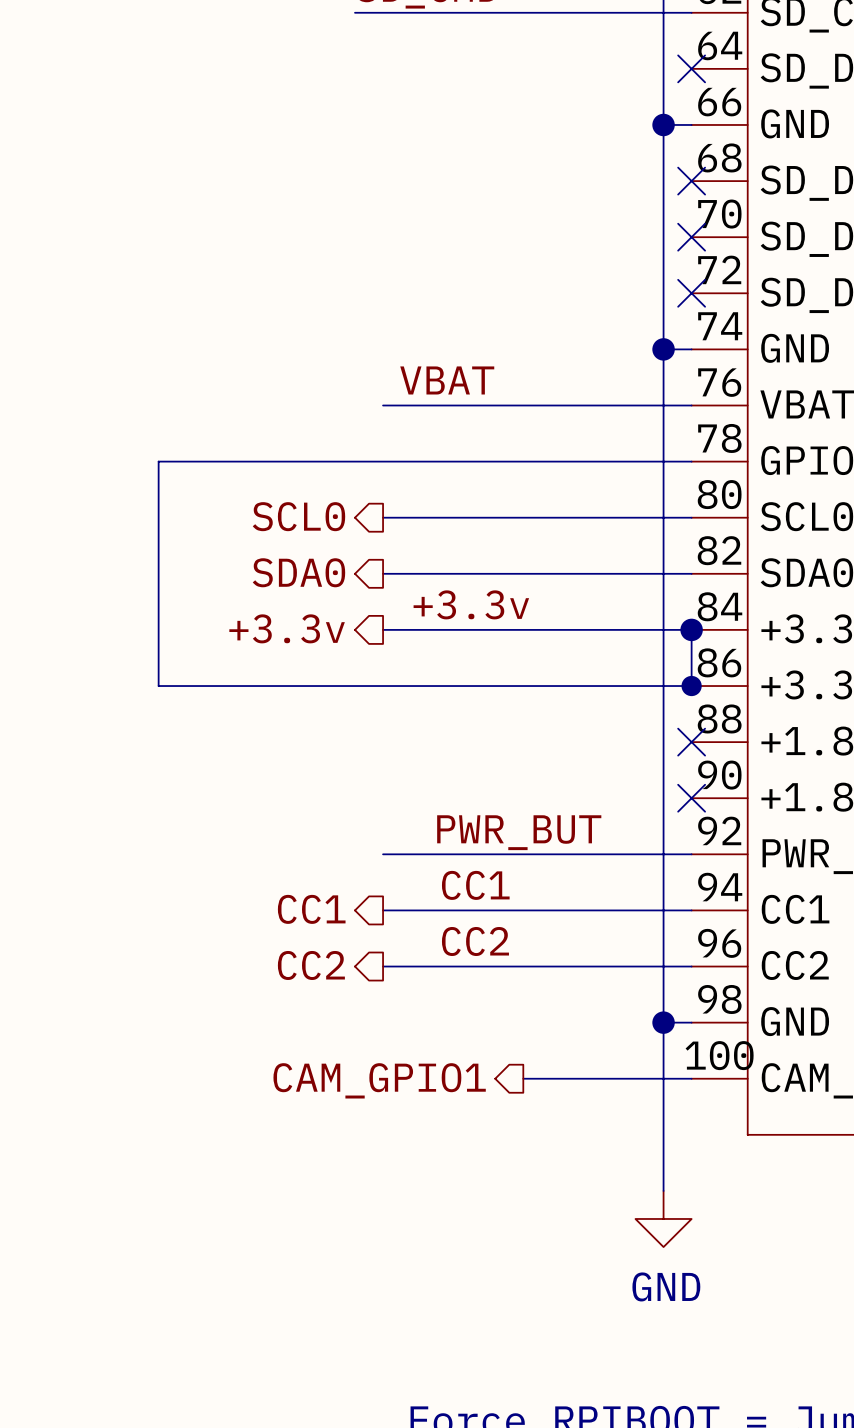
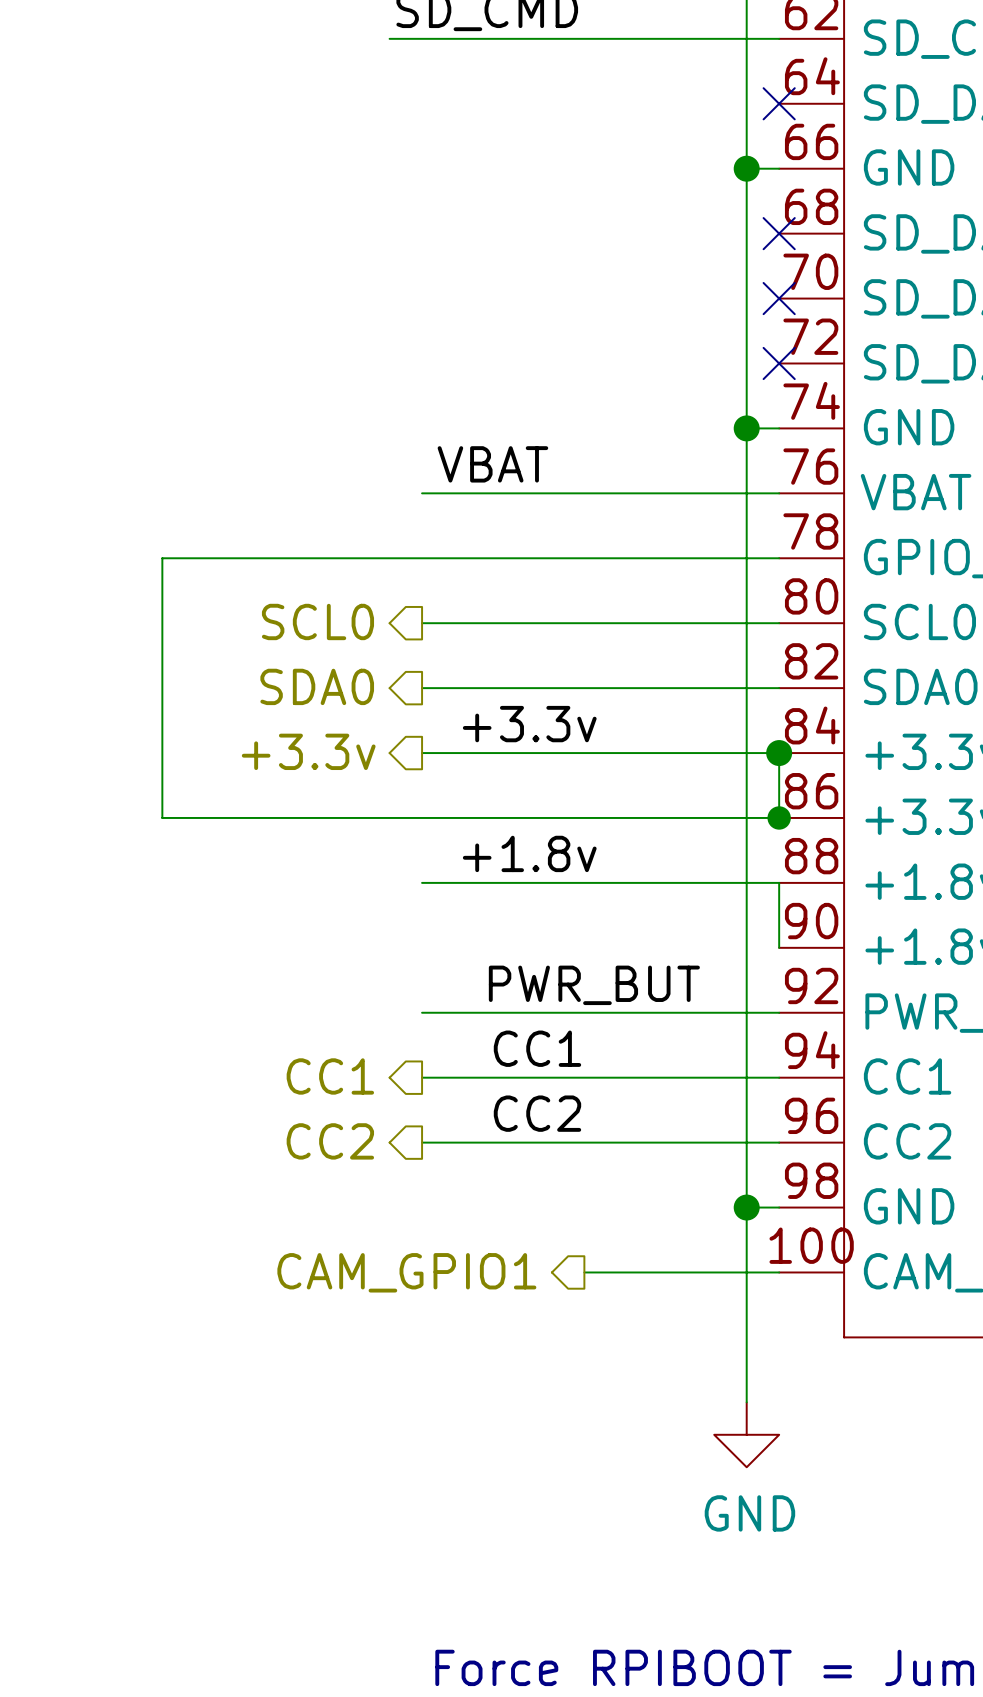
label: none -> +1.8v (529, 853)
wire: none -> (422, 882) (779, 882) (779, 947)
no-connect mark: (691, 742) -> none
no-connect mark: (691, 798) -> none

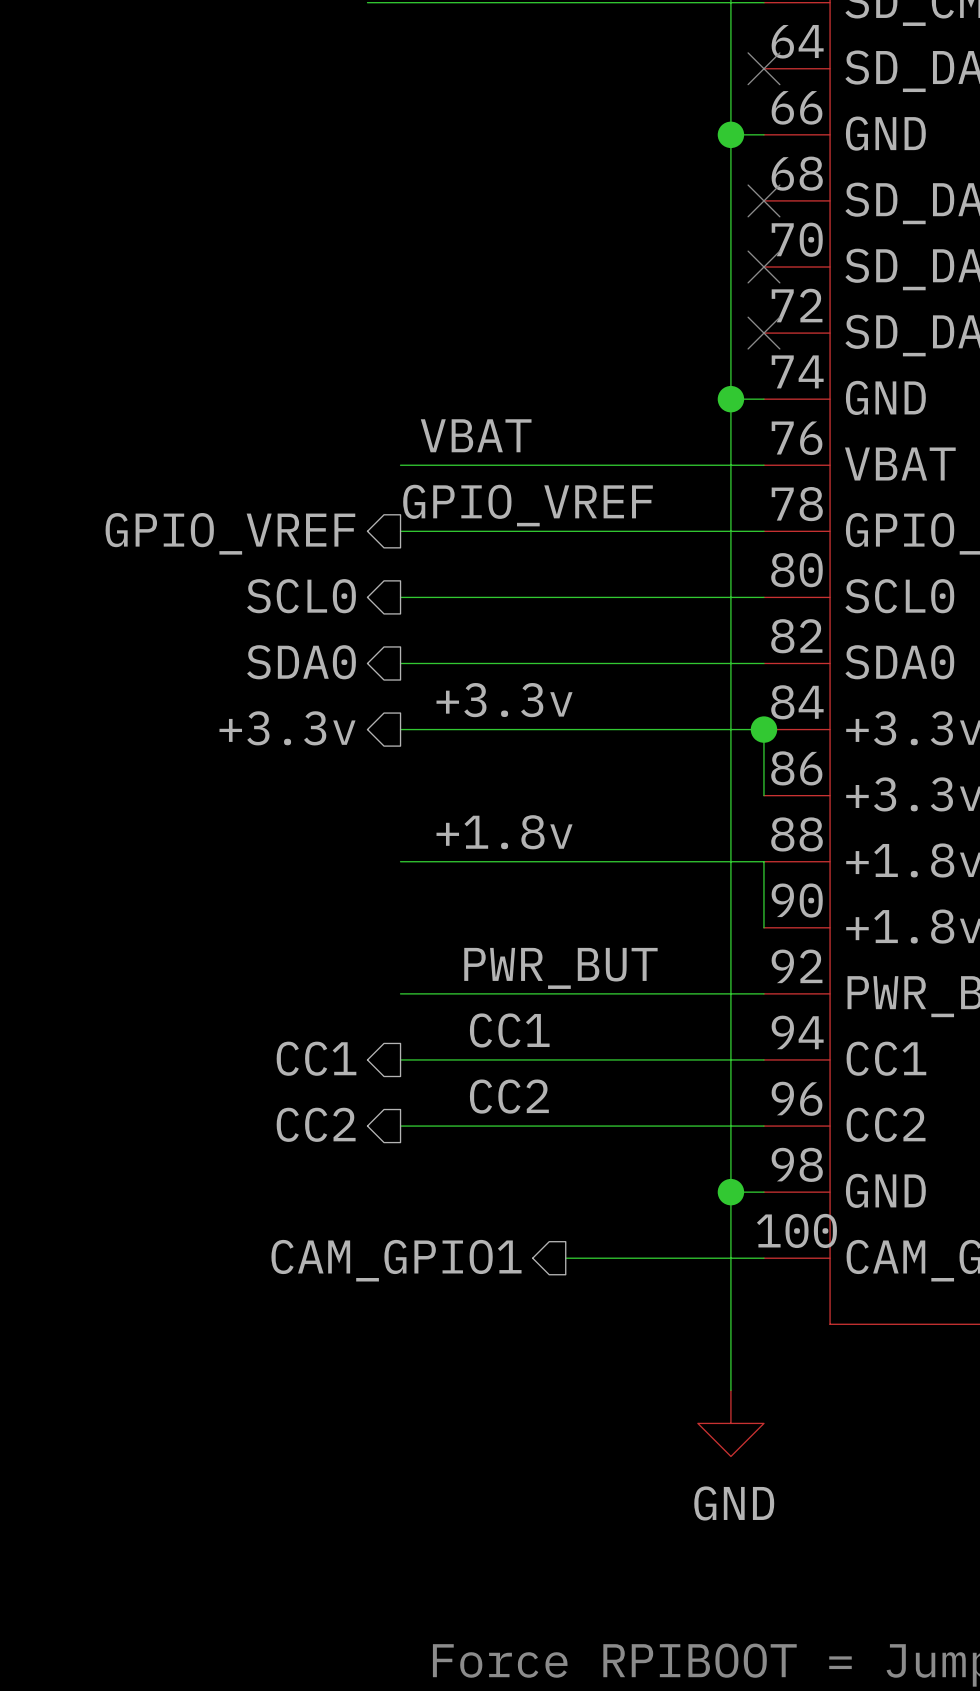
label: none -> GPIO_VREF (528, 505)
hierarchical label: none -> GPIO_VREF (230, 533)
wire: (422, 558) (162, 558) (162, 817) (779, 817) -> none
junction: (779, 817) -> none

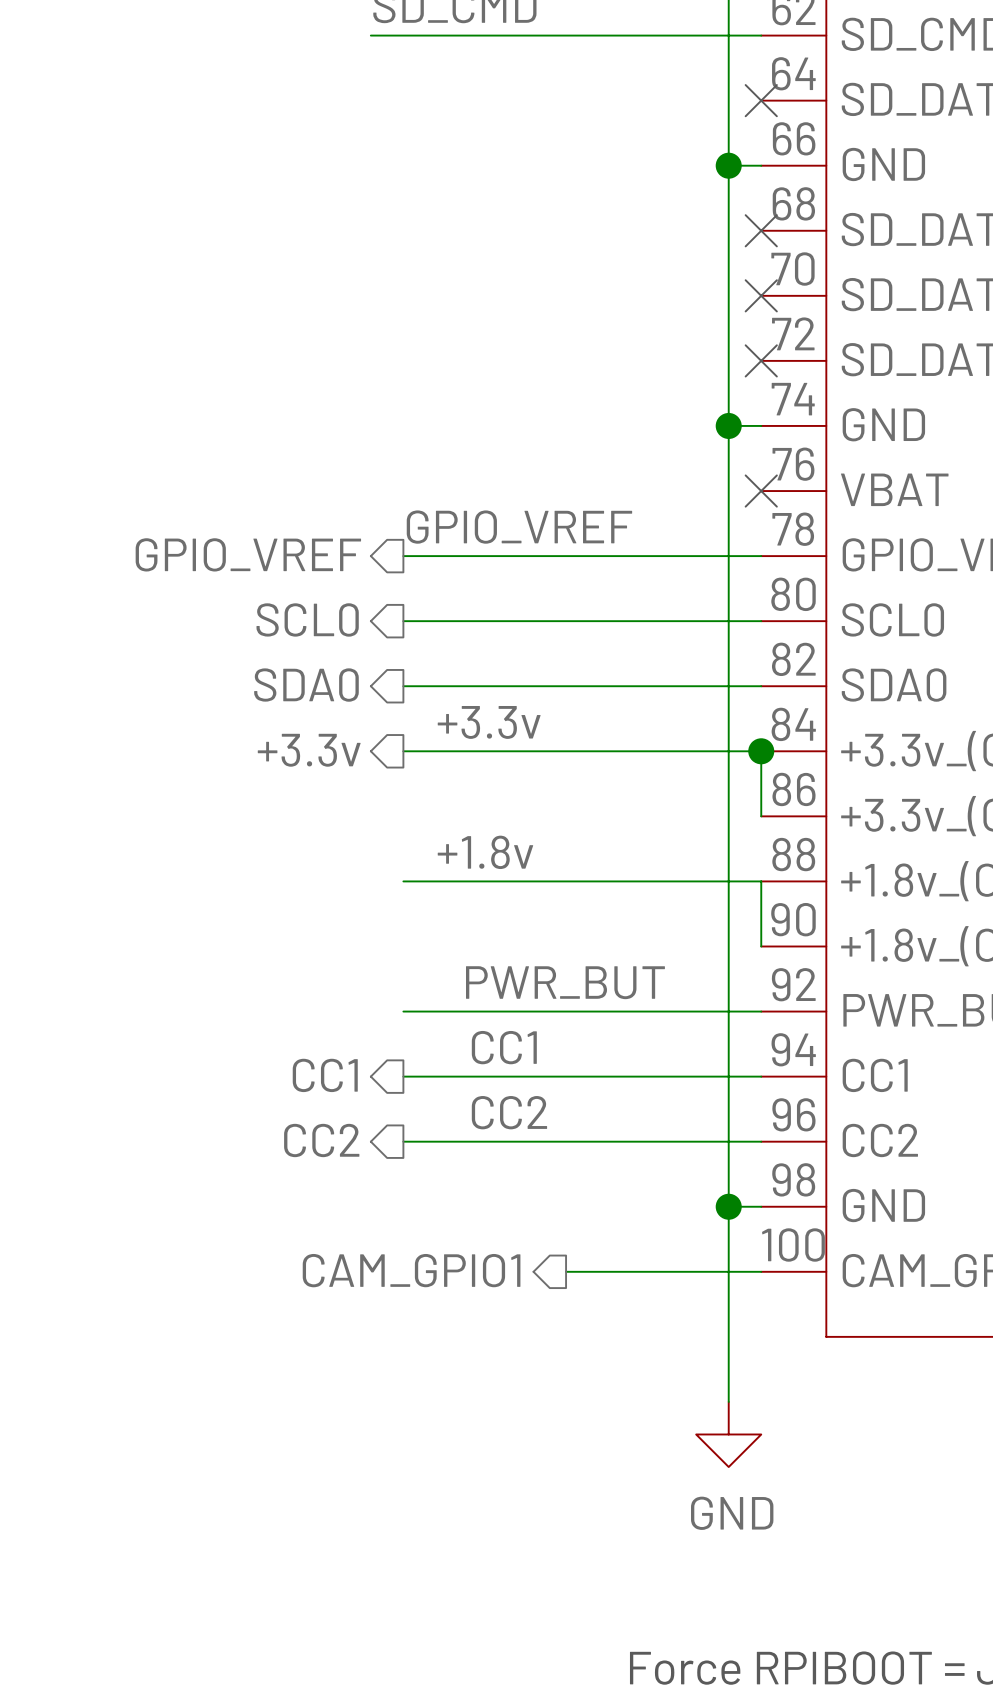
label: VBAT (476, 435) -> none
wire: (400, 465) (763, 465) -> none
no-connect mark: none -> (761, 491)

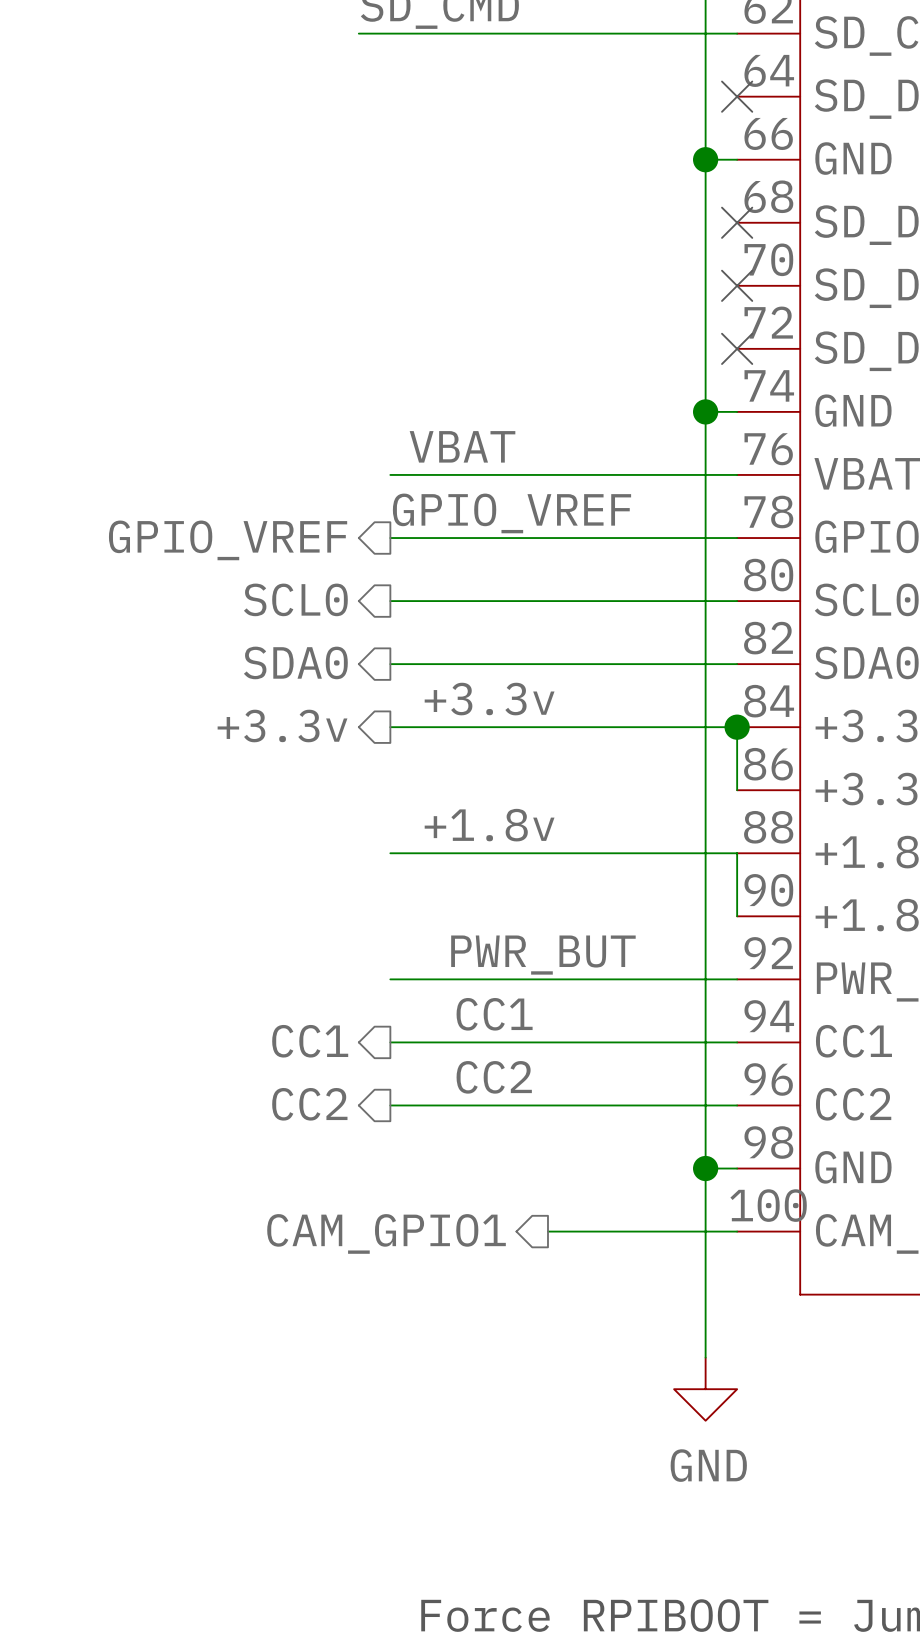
label: none -> VBAT (462, 446)
wire: none -> (390, 474) (737, 474)
no-connect mark: (761, 491) -> none

